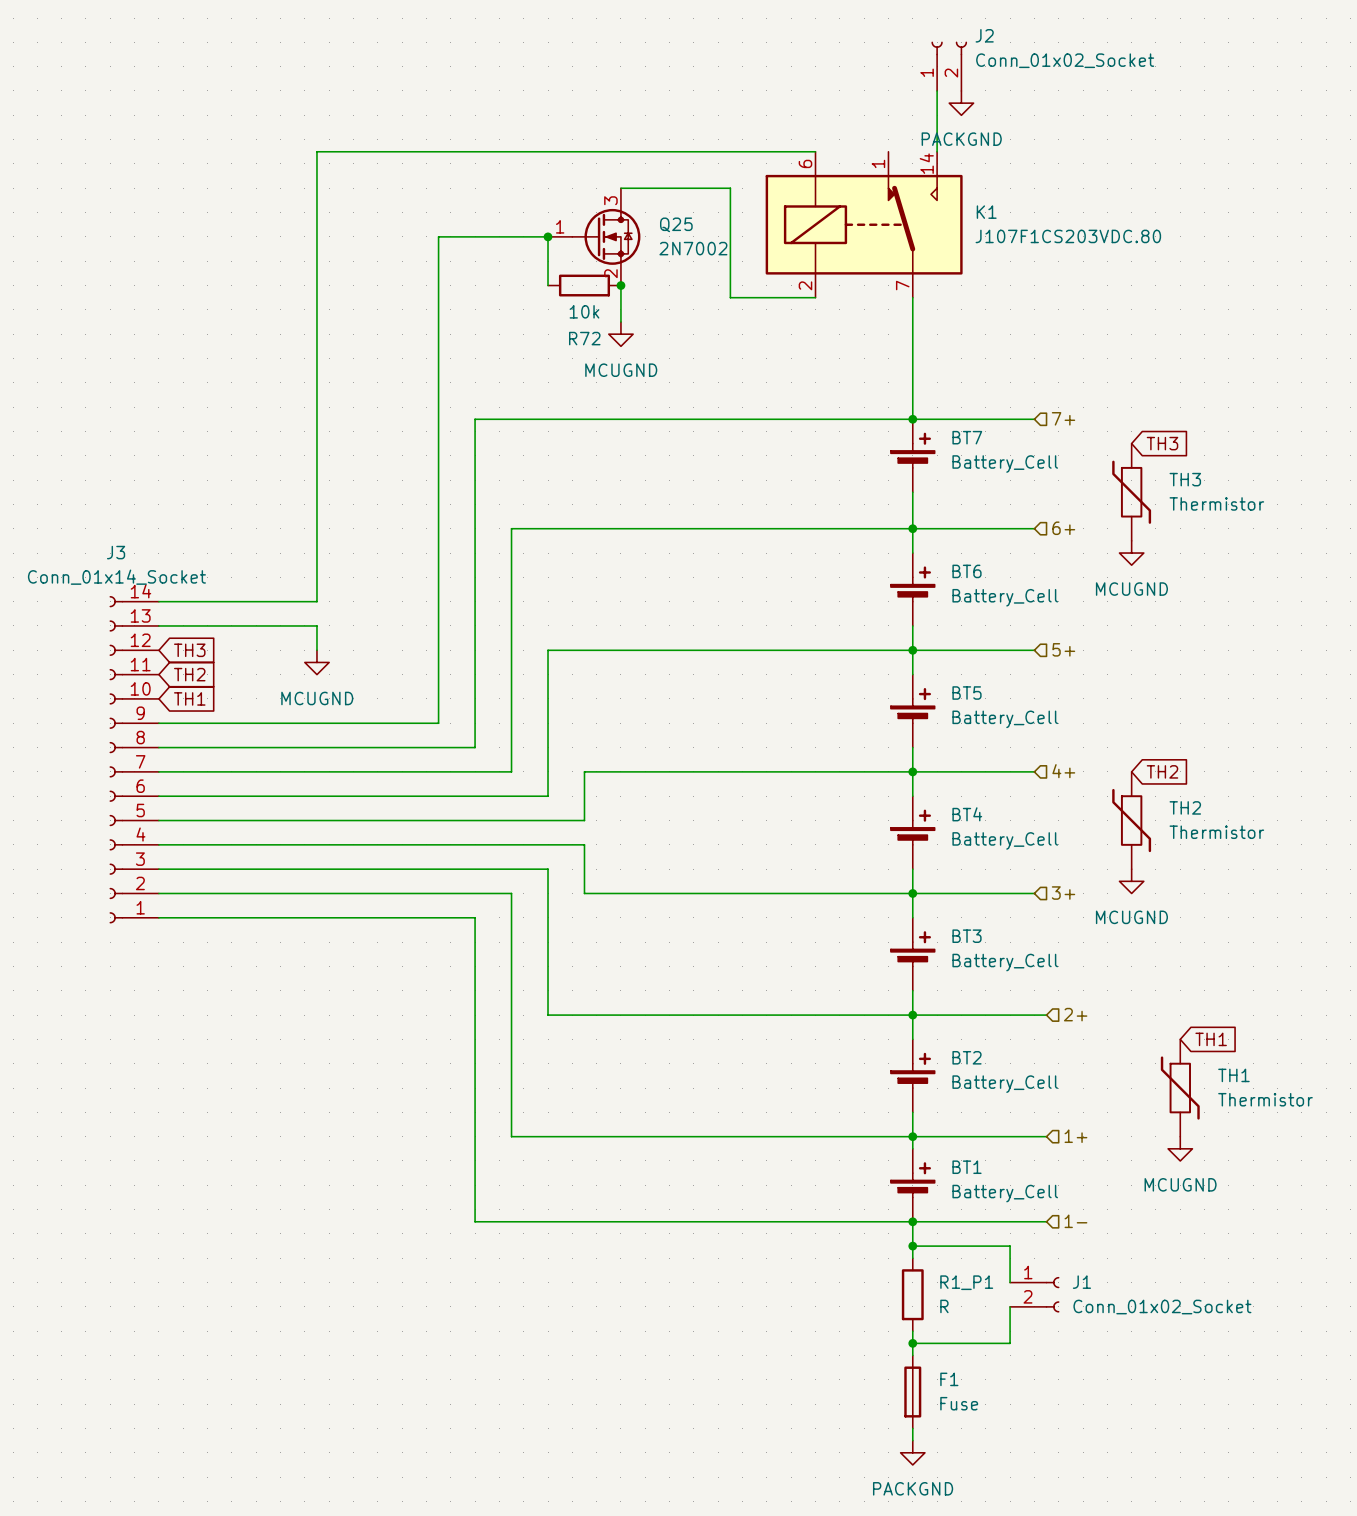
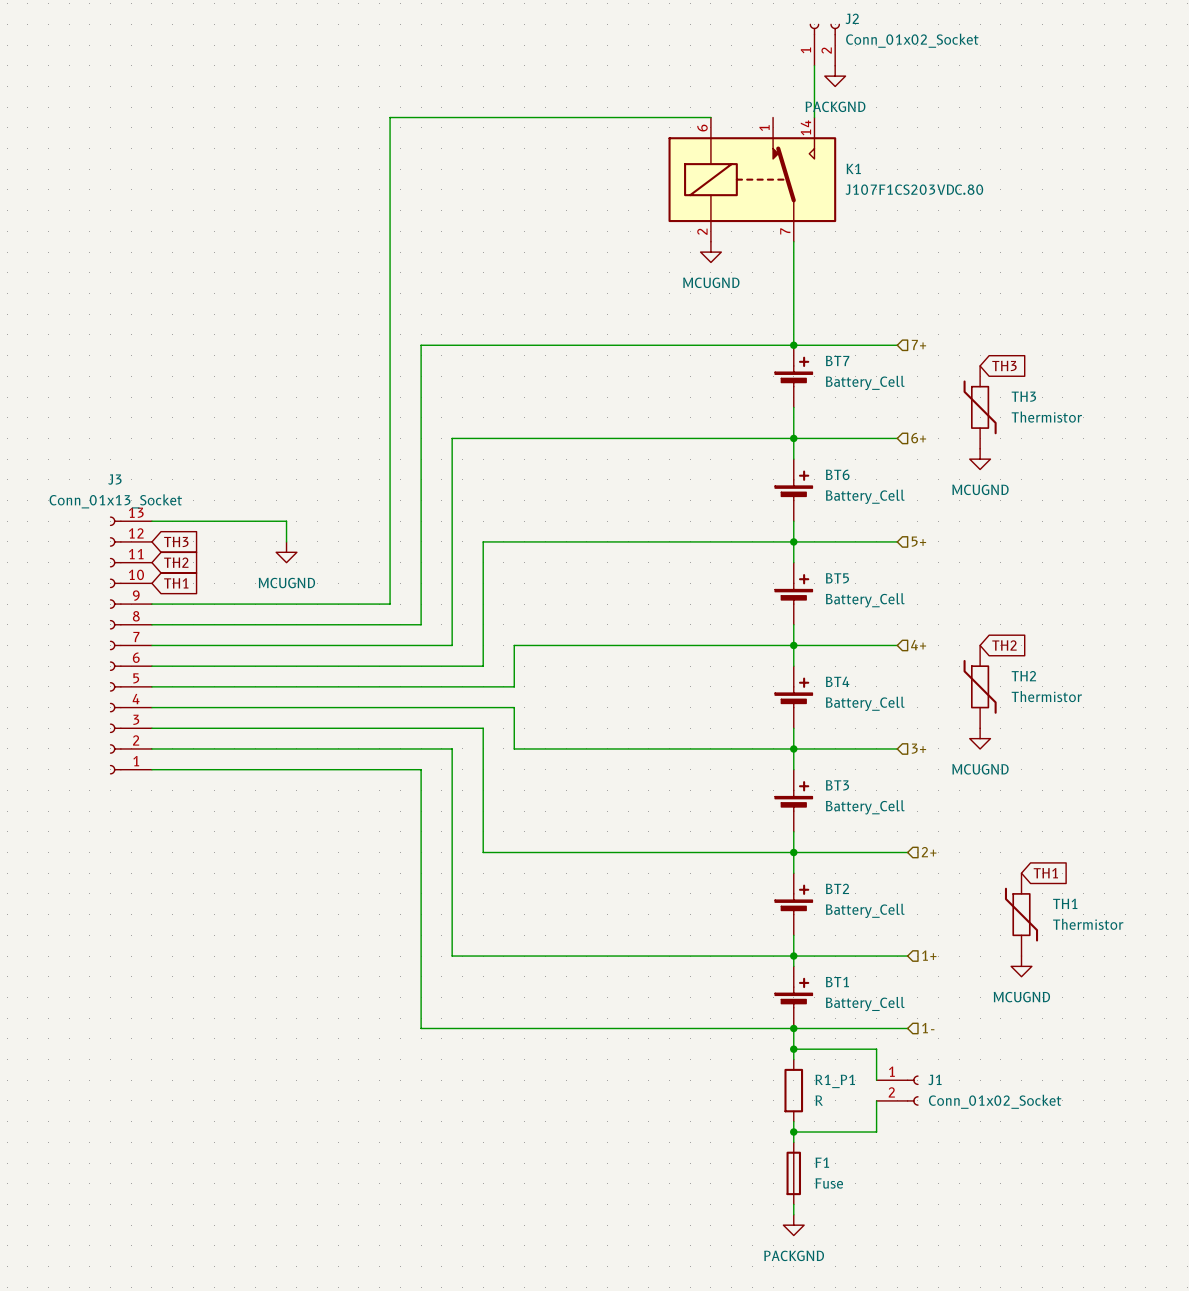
wire: (438, 151) (316, 151) (316, 601) (158, 601) -> none
wire: (620, 188) (730, 188) (730, 297) (815, 297) -> none
wire: (438, 236) (548, 236) (548, 285) -> (390, 189) (390, 117)
junction: (548, 236) -> none
Q25: 2N7002 (594, 236) -> none
R72: 10k (584, 285) -> none
wire: (620, 285) (620, 322) -> none
junction: (620, 285) -> none
power symbol position: MCUGND (620, 334) -> MCUGND (710, 252)
J3 value: Conn_01x14_Socket (116, 577) -> Conn_01x13_Socket (115, 501)
J3 symbol: [109, 596, 159, 924] -> [109, 516, 152, 775]

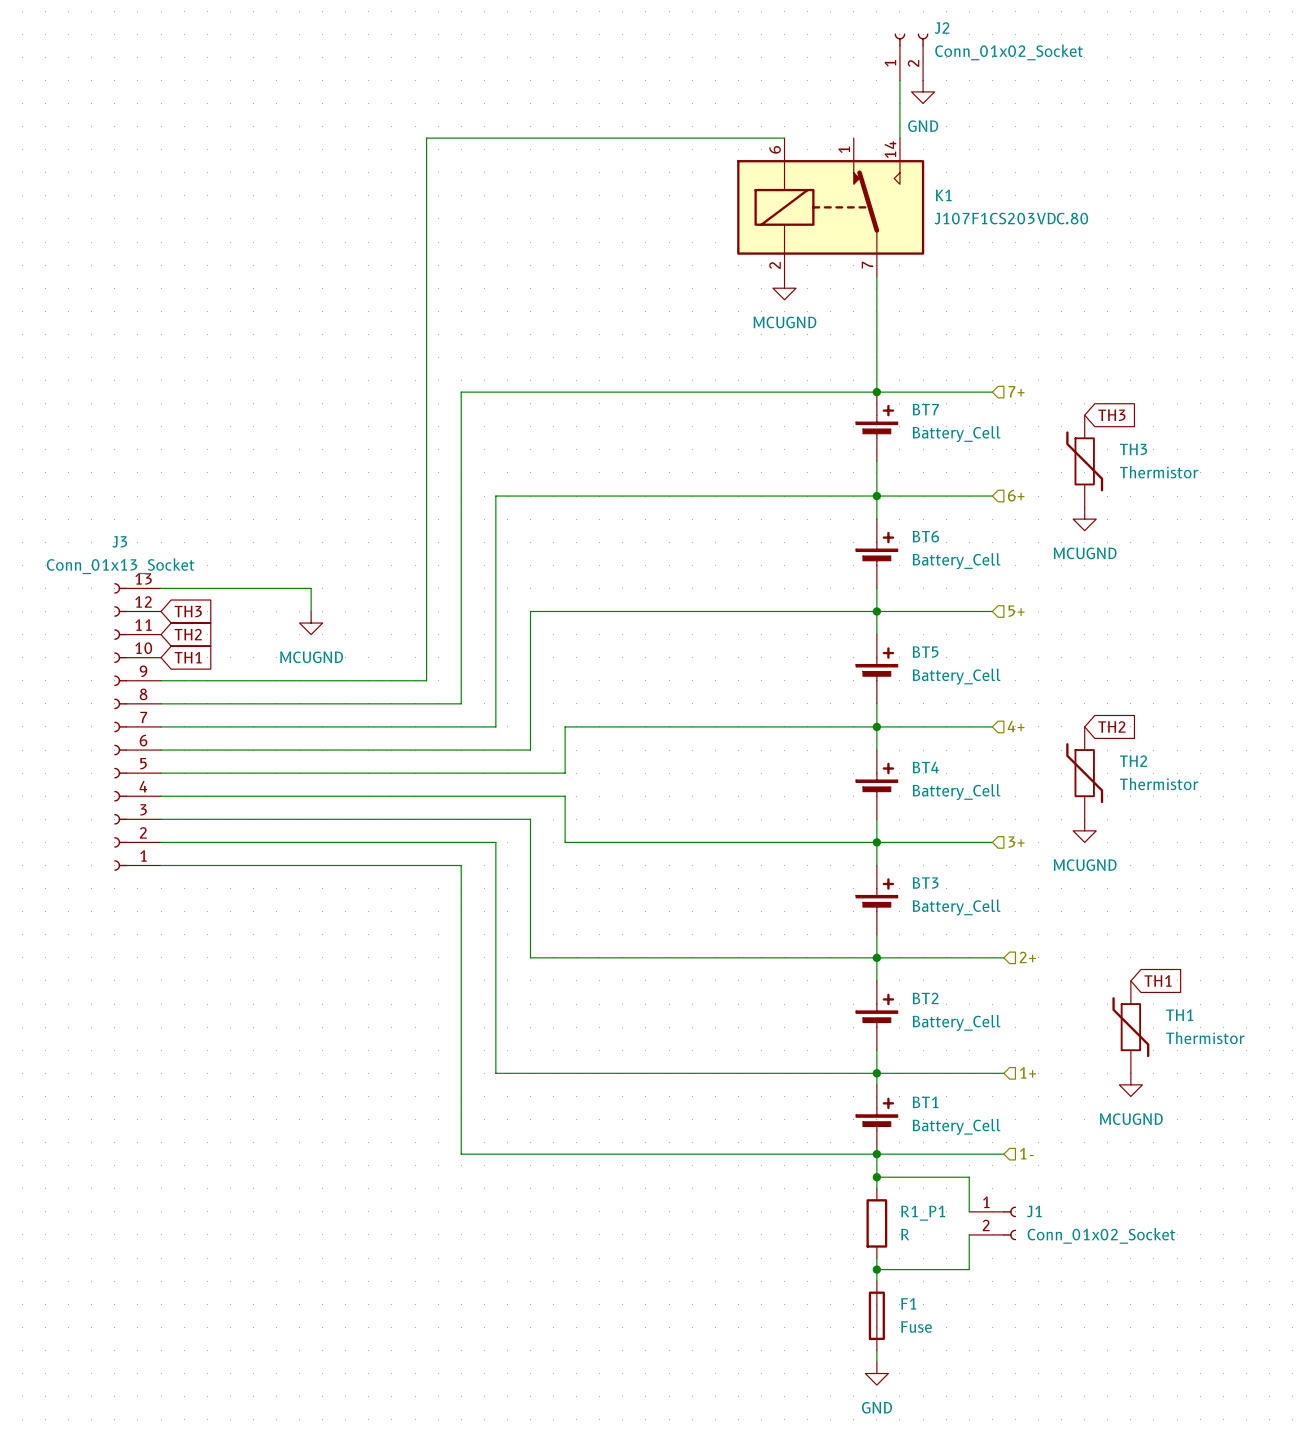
power symbol: PACKGND (835, 76) -> GND (923, 91)
power symbol: PACKGND (793, 1225) -> GND (876, 1373)

